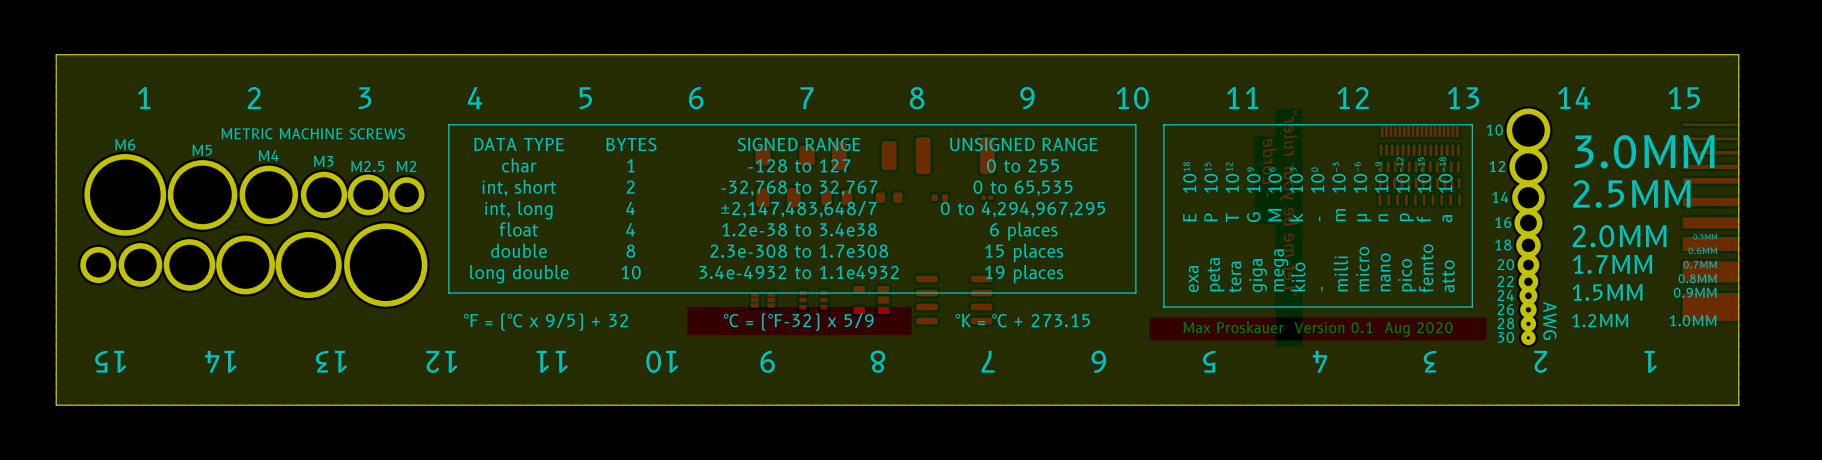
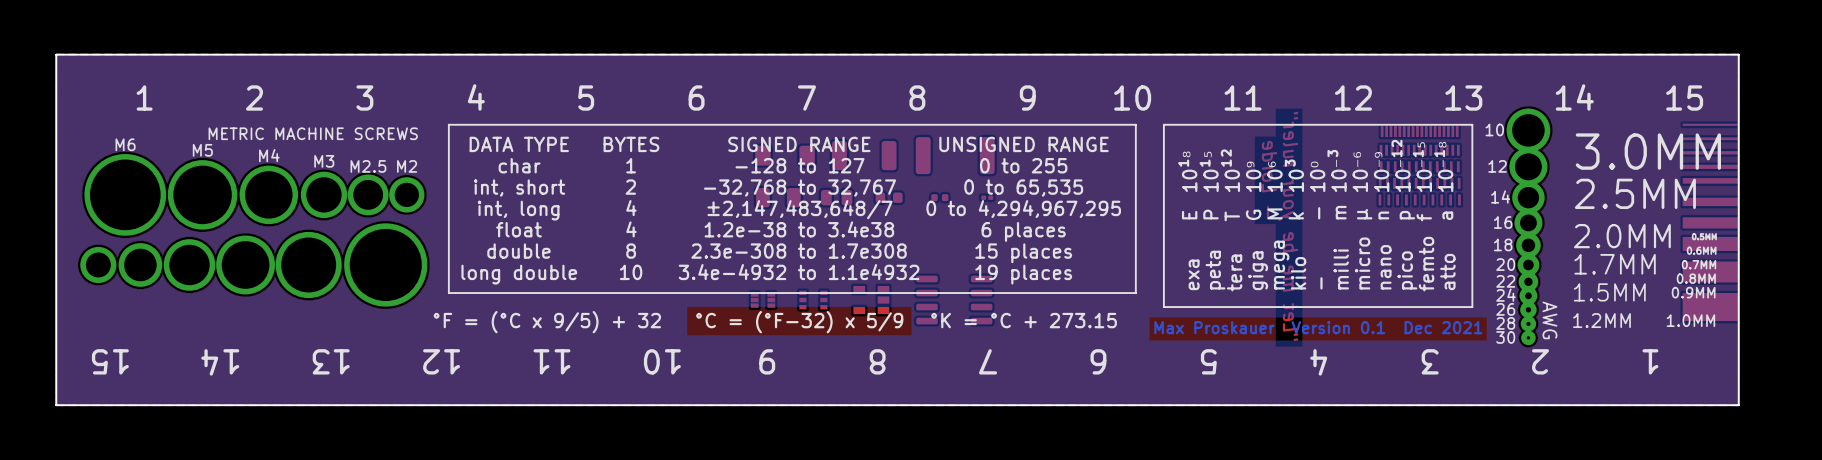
text: Max Proskauer Version 0.1 Aug 2020 (1318, 329) -> Max Proskauer Version 0.1 Dec 2021 (1318, 327)

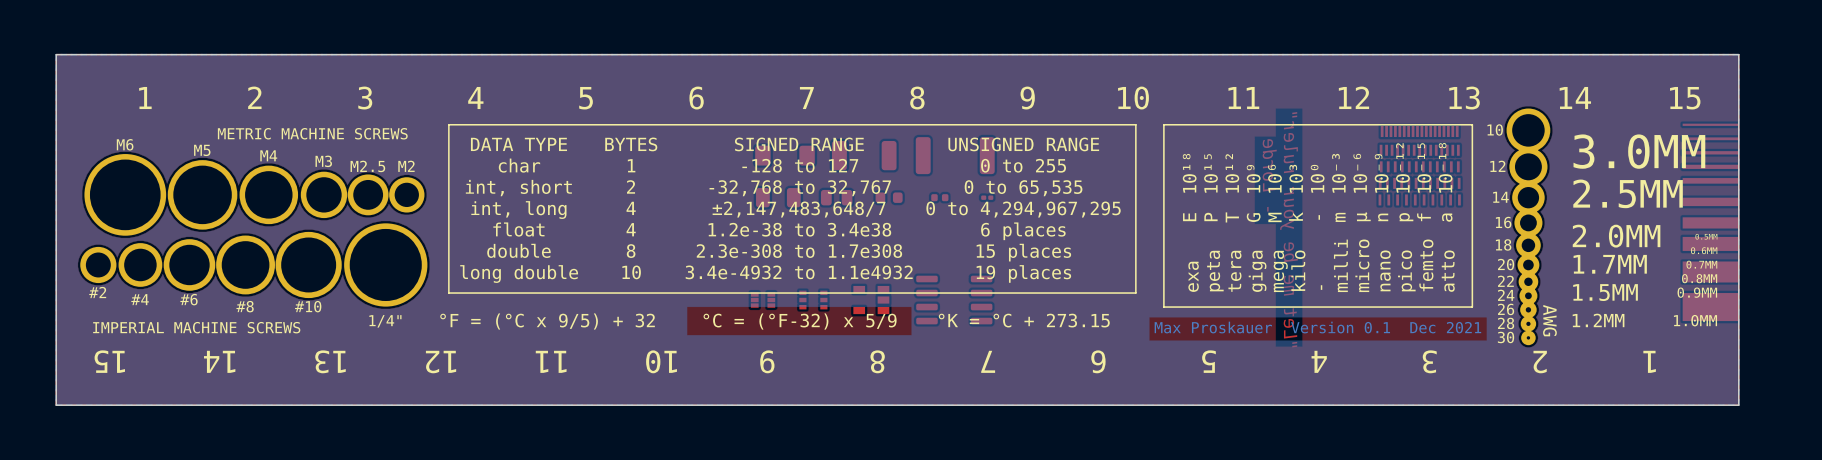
part text: none -> #2 (97, 292)
part text: none -> #4 (140, 299)
part text: none -> #6 (189, 299)
part text: none -> #8 (245, 306)
part text: none -> #10 (308, 306)
part text: none -> 1/4" (385, 321)
part text: none -> IMPERIAL MACHINE SCREWS (196, 327)

